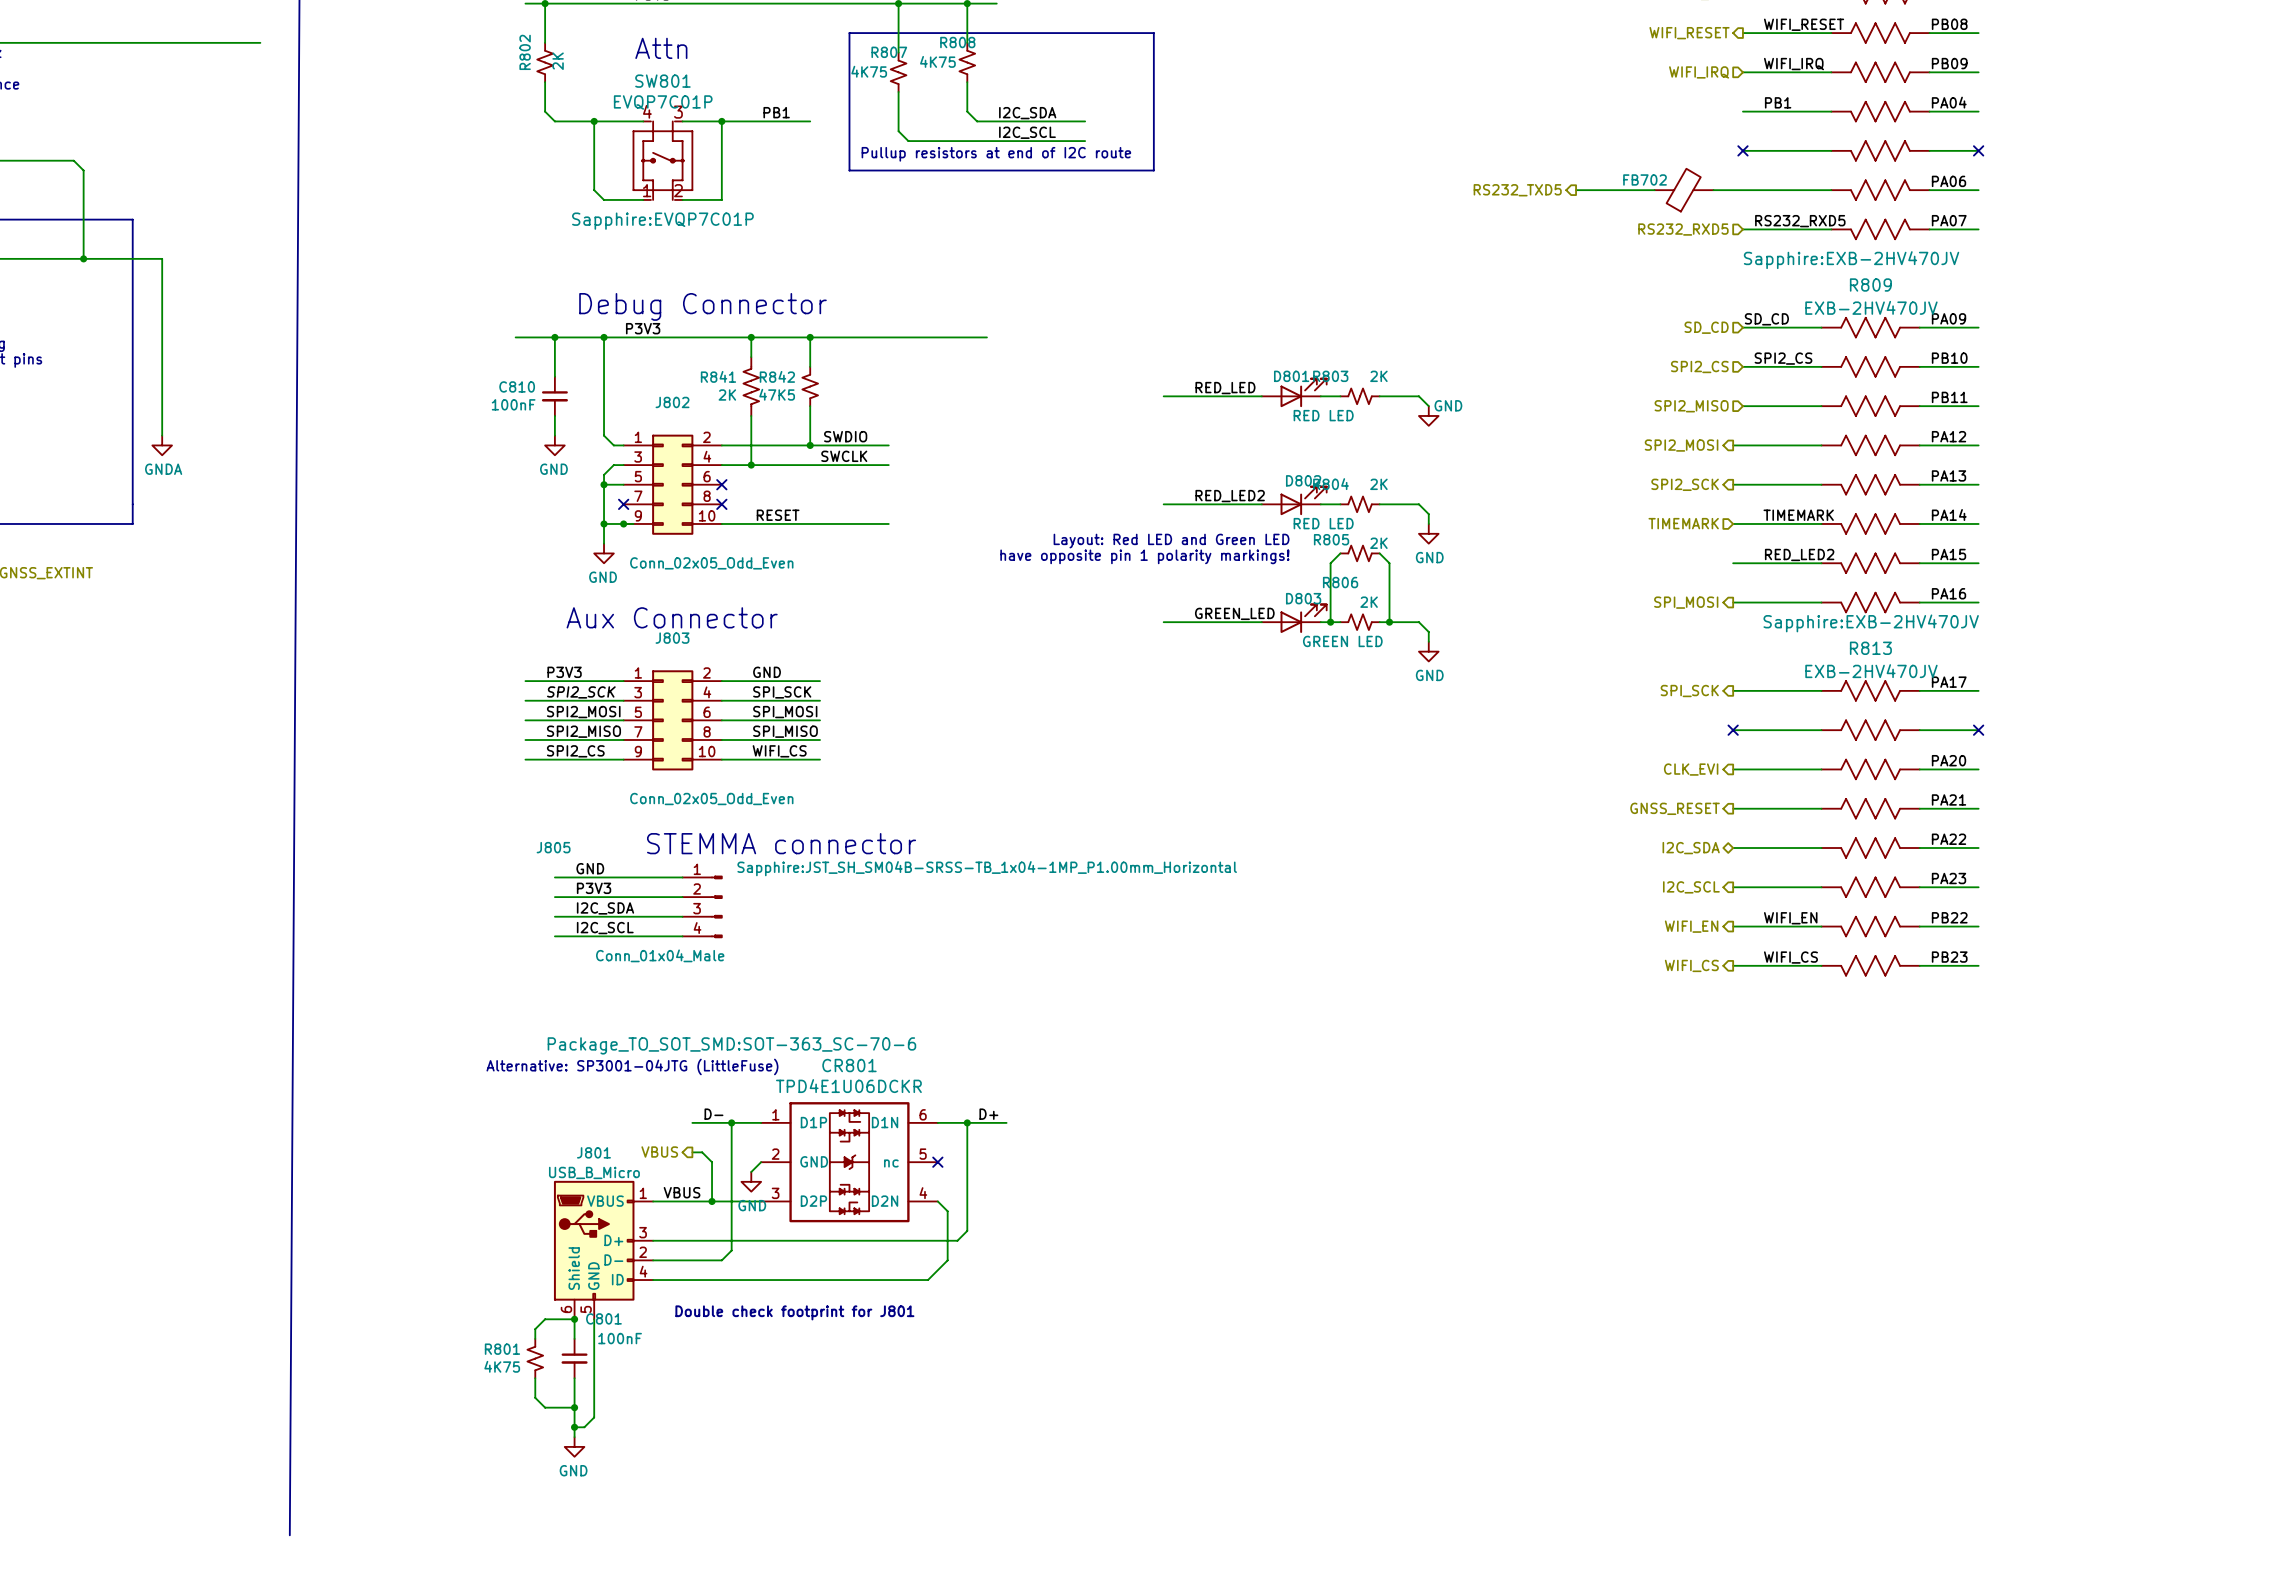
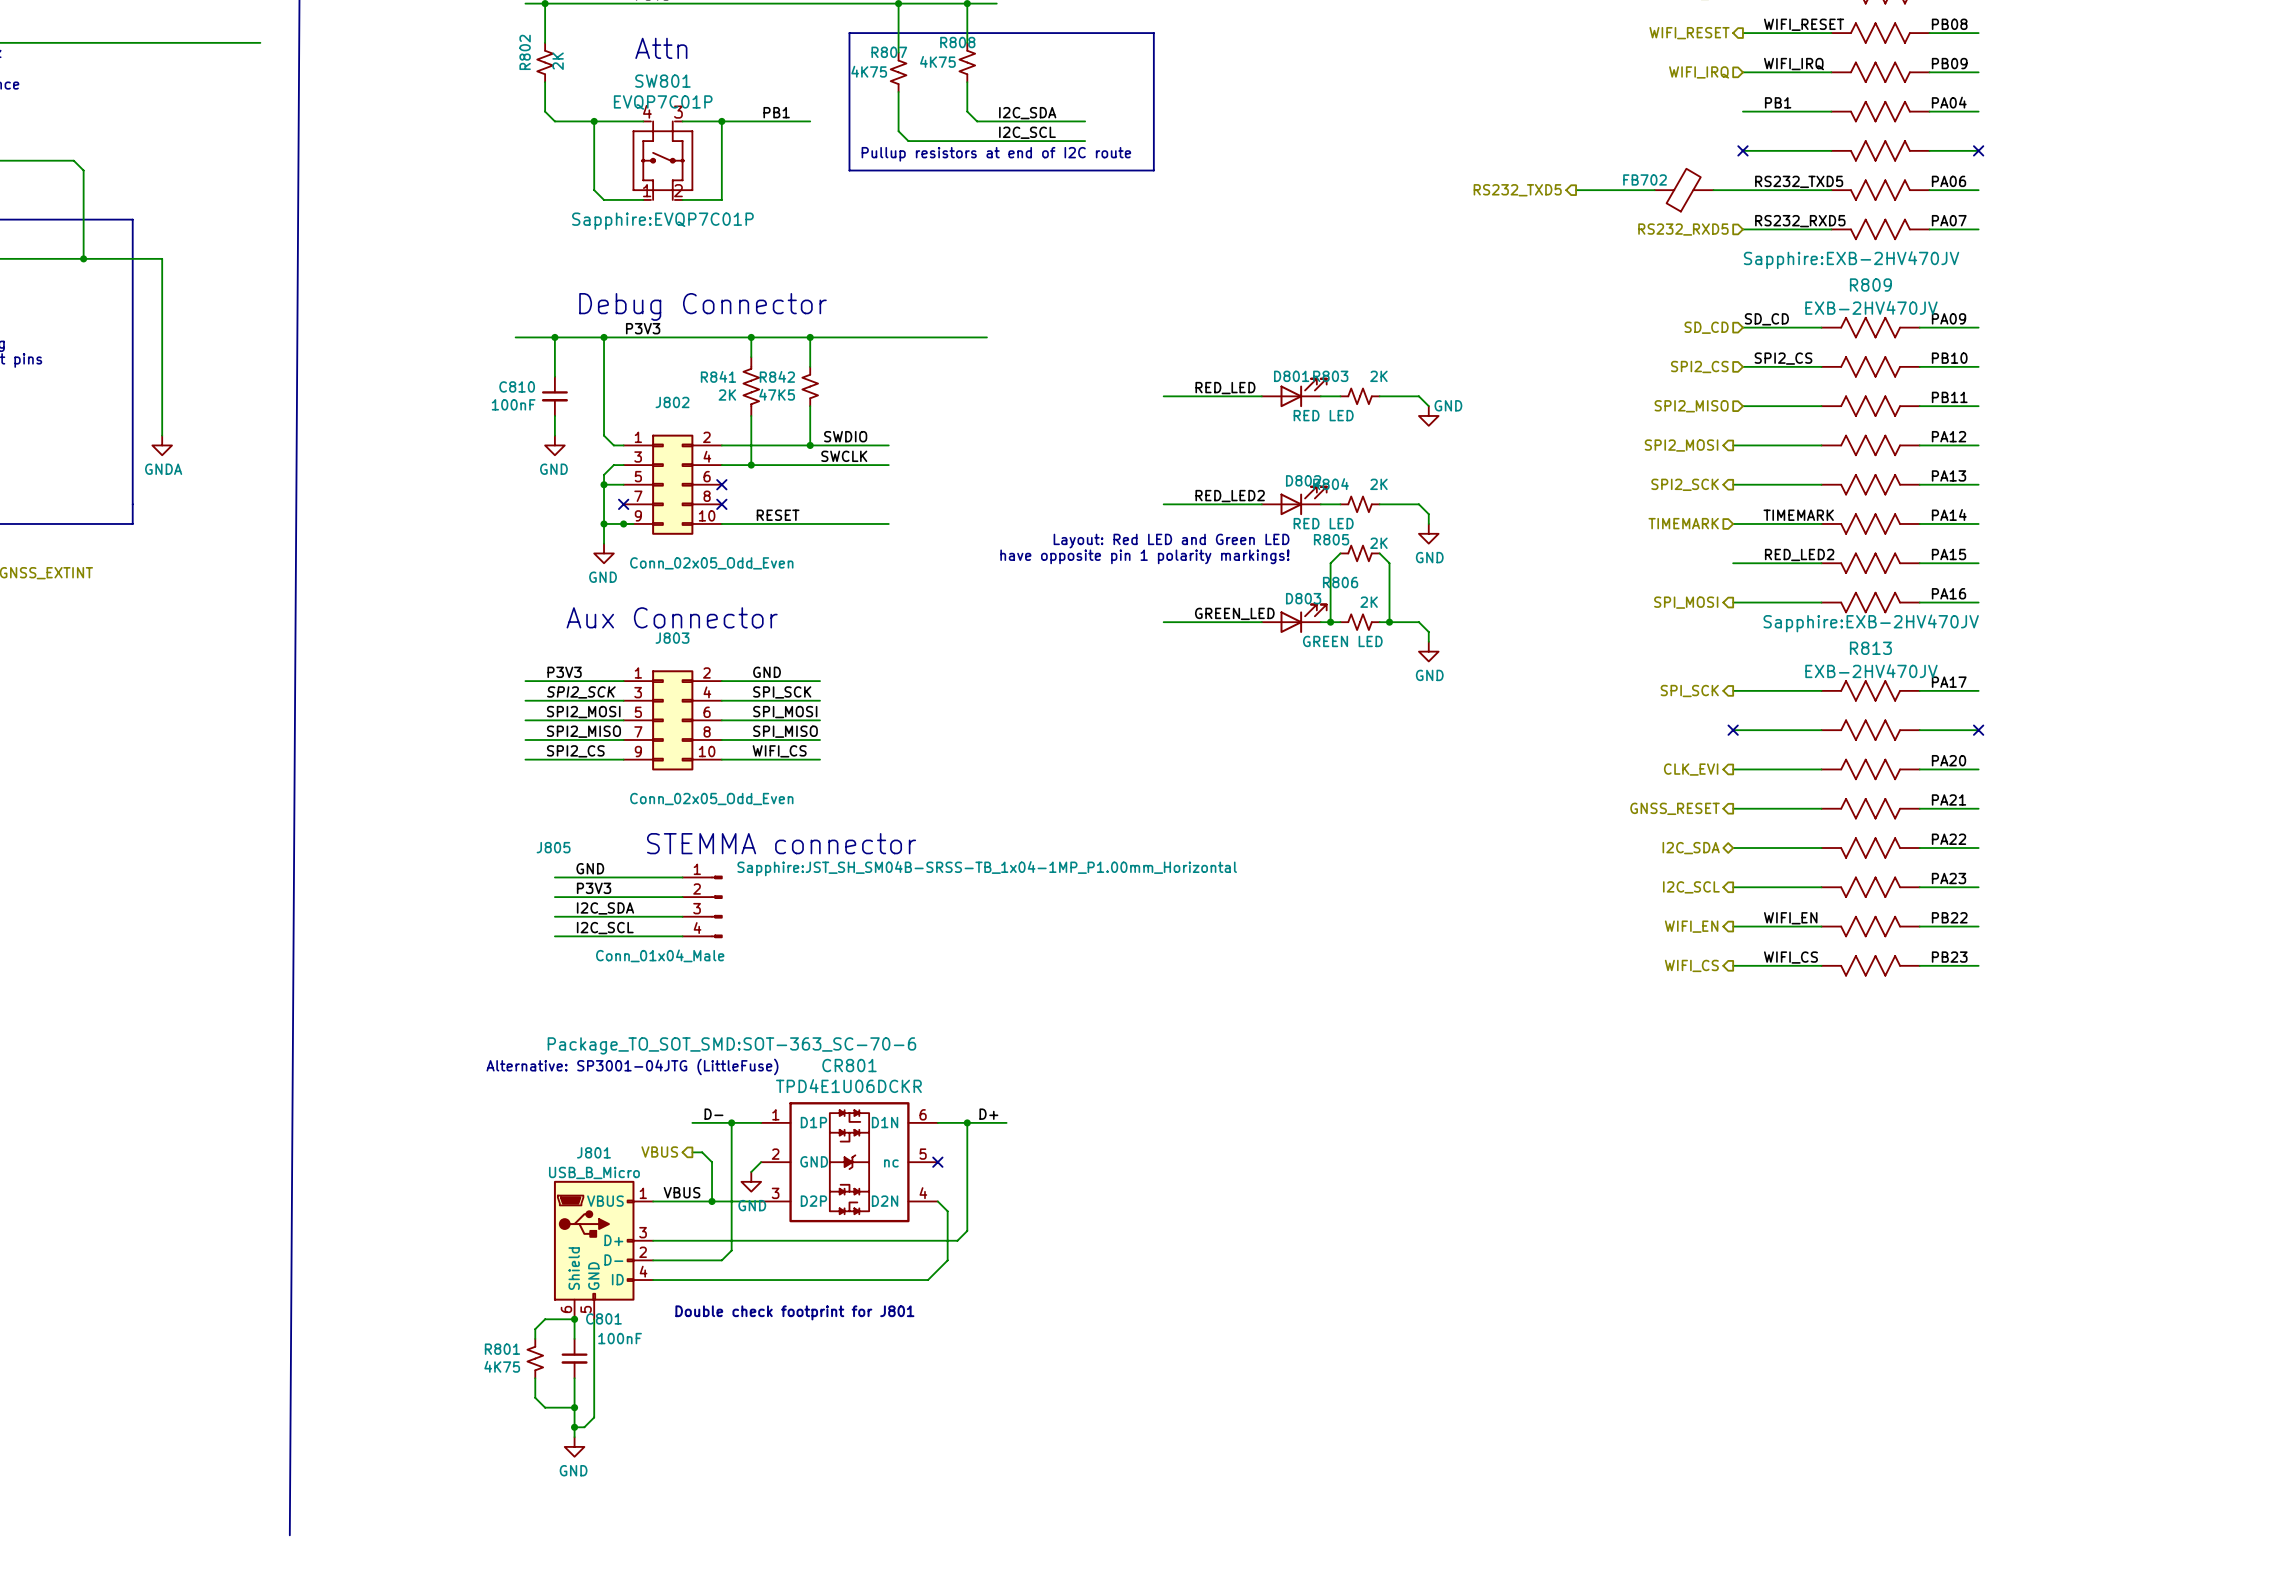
label: none -> RS232_TXD5 (1799, 181)

